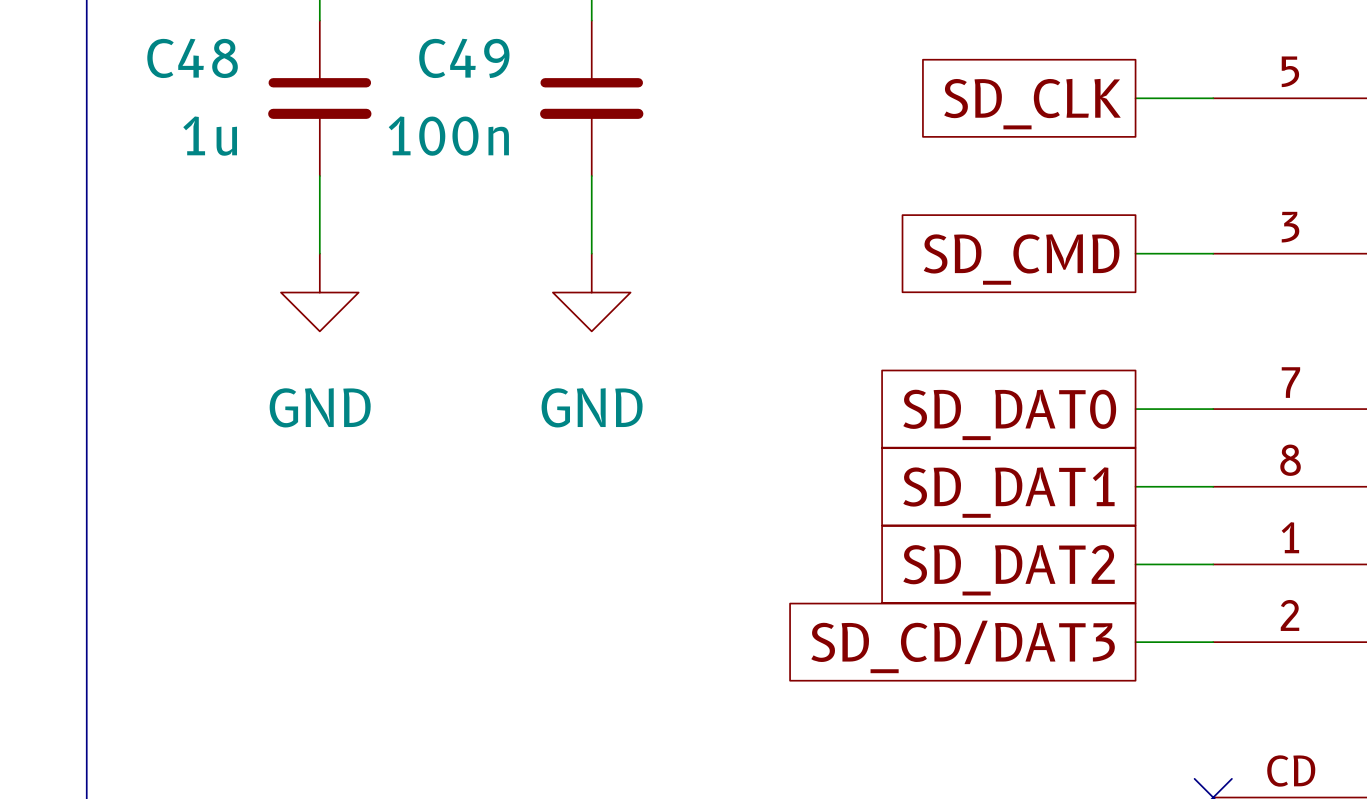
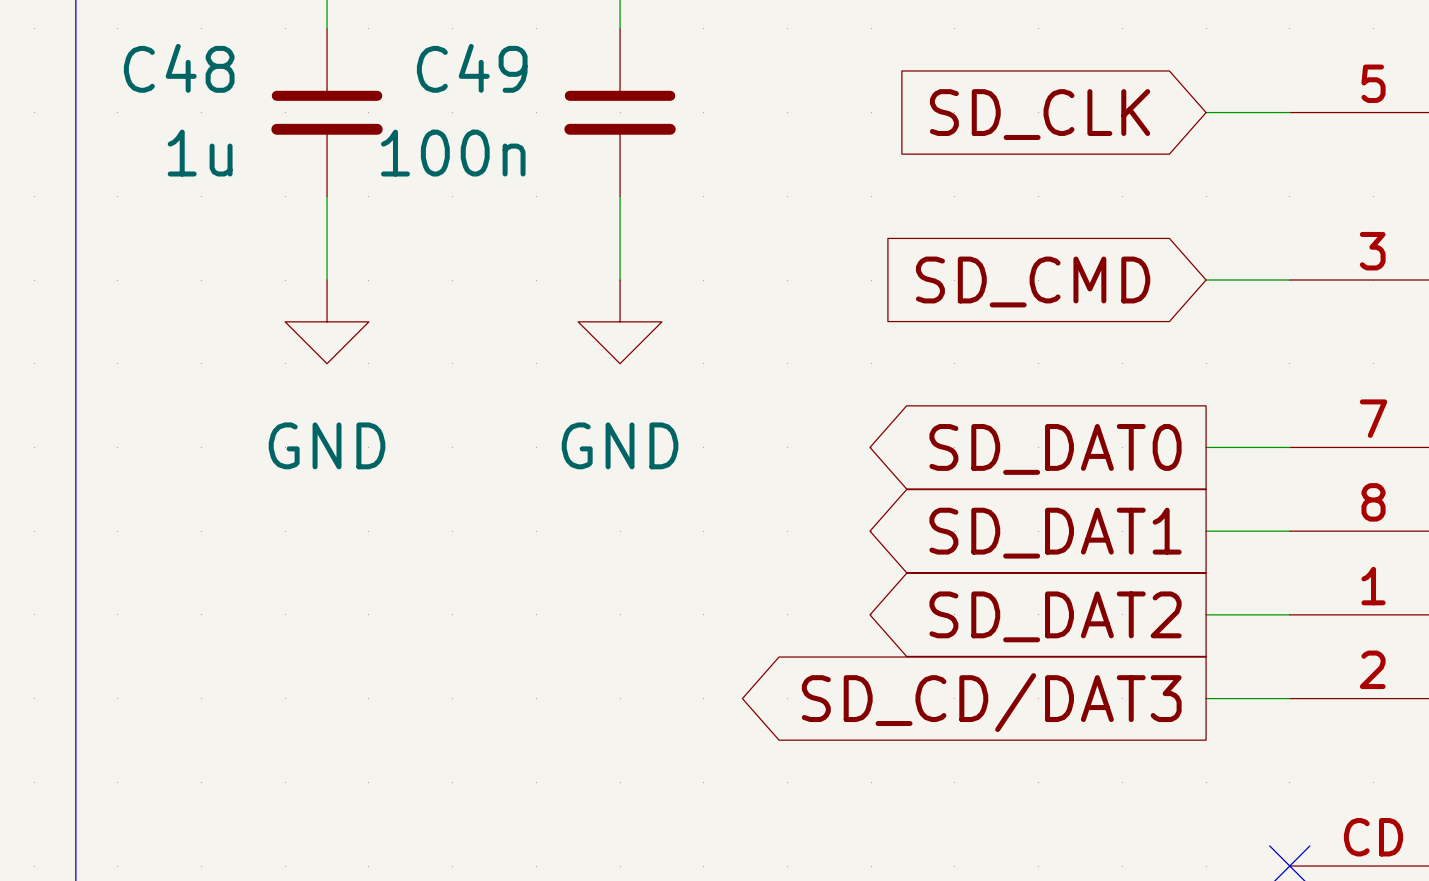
global label shape: passive (1032, 104) -> input (1040, 114)
global label shape: passive (1021, 259) -> input (1033, 281)
global label shape: passive (1009, 414) -> output (1055, 449)
global label shape: passive (1008, 492) -> output (1055, 533)
global label shape: passive (1009, 570) -> output (1055, 616)
global label shape: passive (963, 646) -> output (991, 702)

